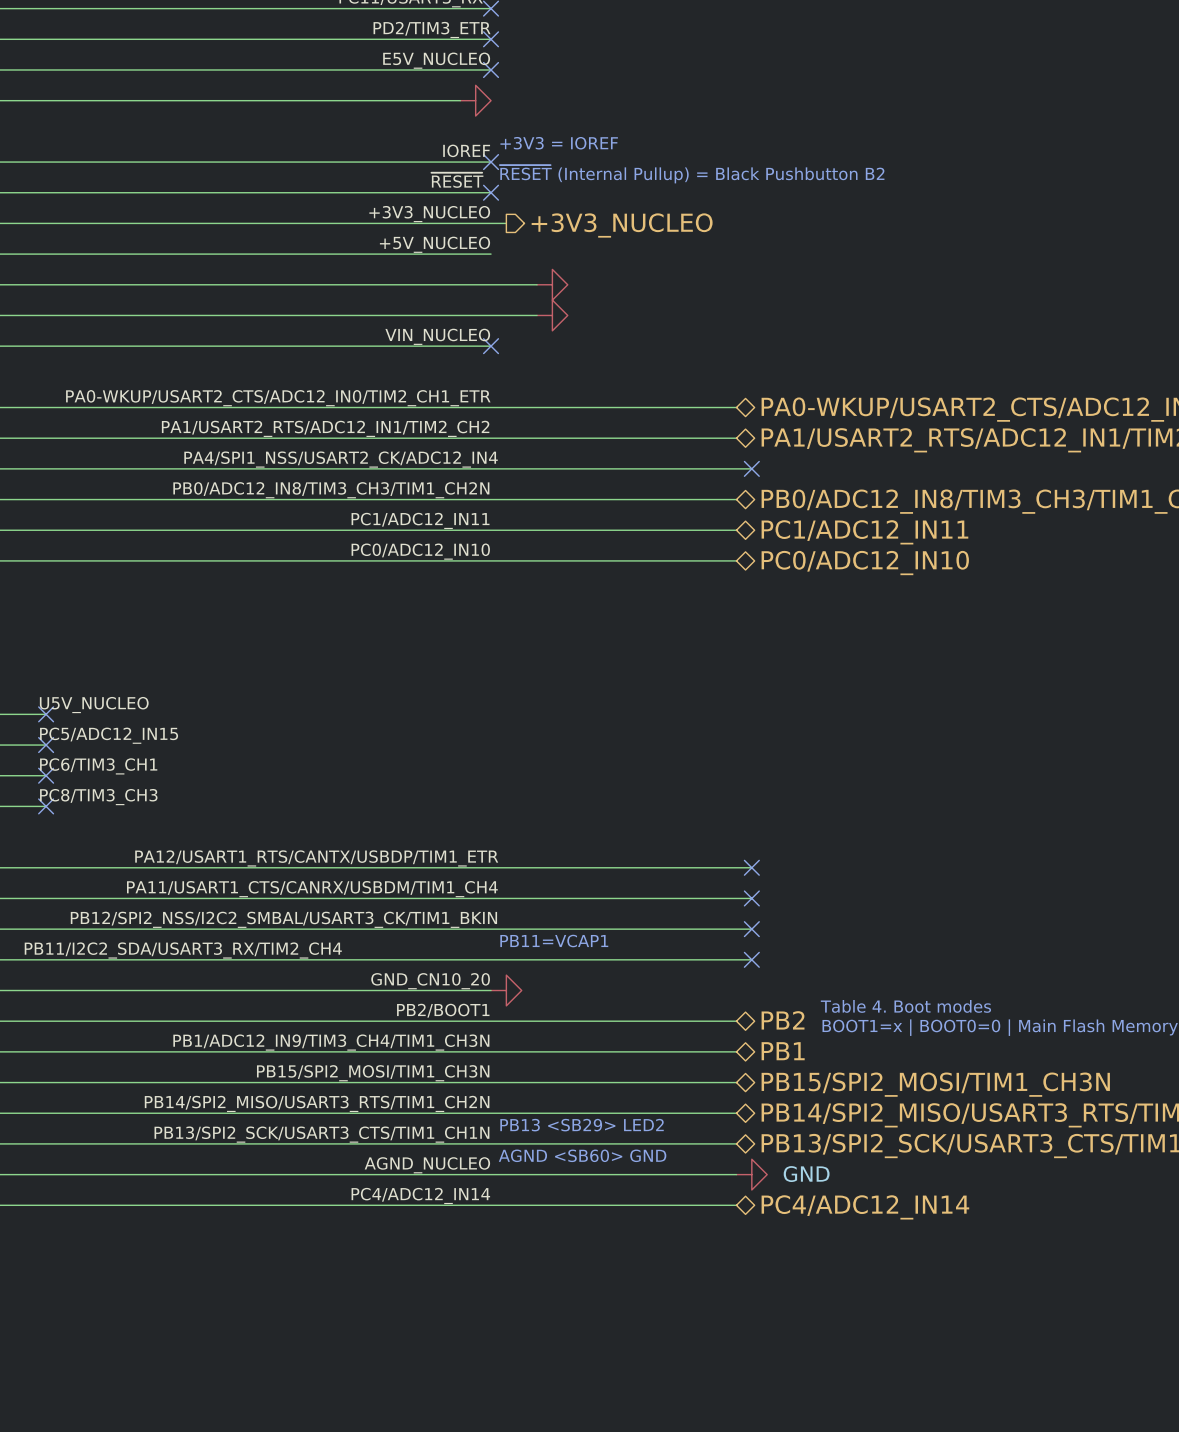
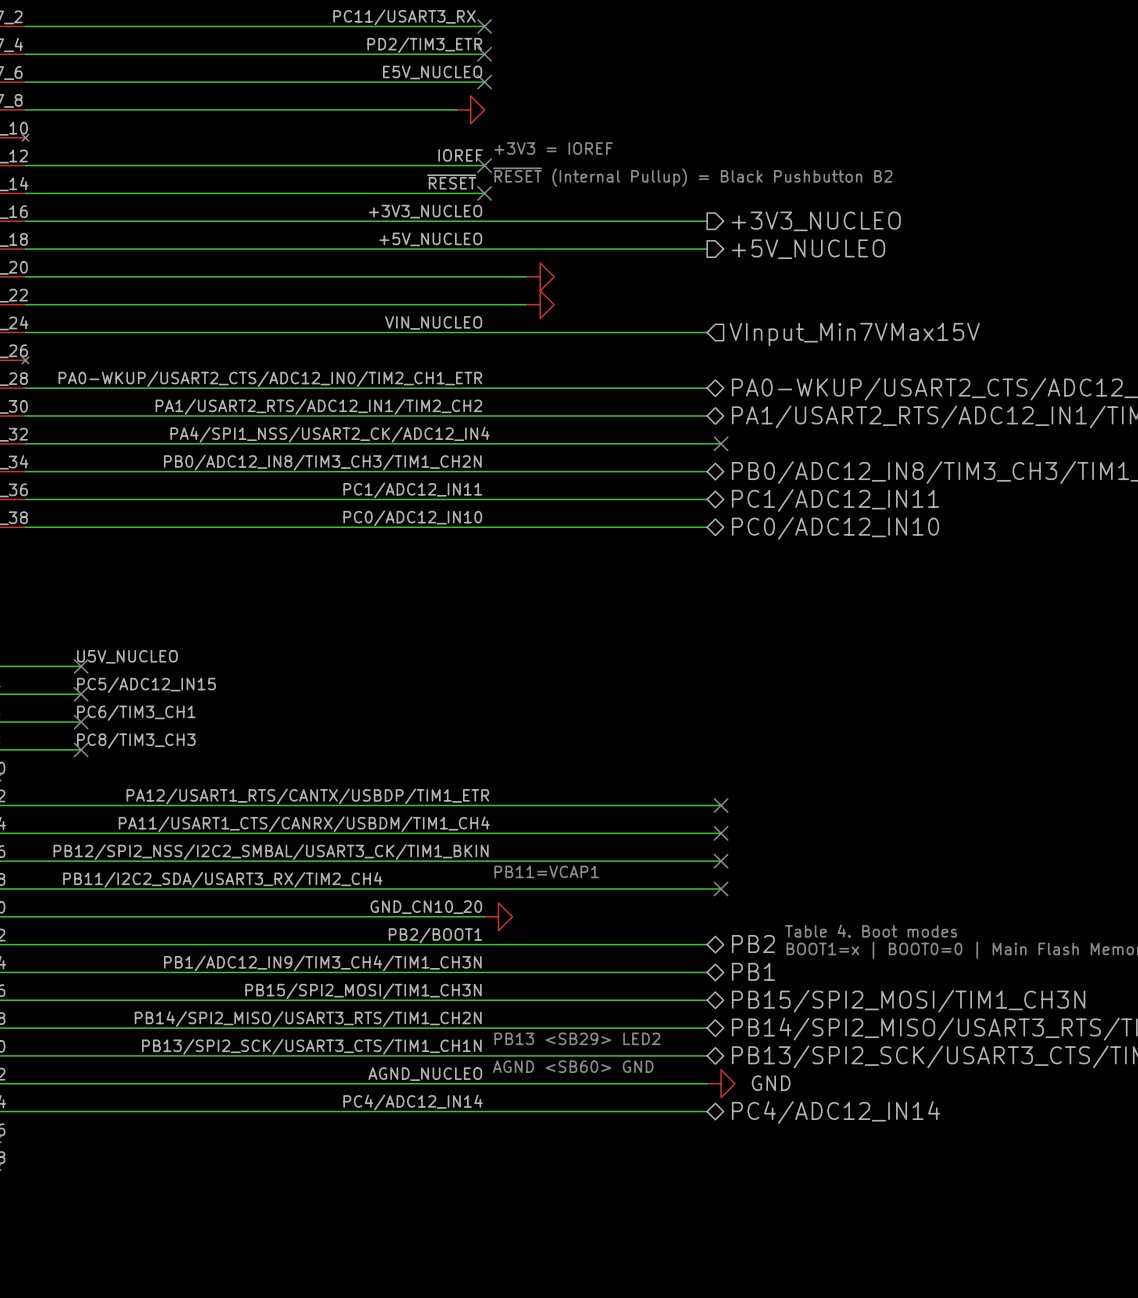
wire: none -> (498, 221) (707, 221)
hierarchical label position: +3V3_NUCLEO (622, 225) -> +3V3_NUCLEO (816, 221)
wire: none -> (484, 249) (707, 249)
hierarchical label: none -> +5V_NUCLEO (808, 249)
wire: none -> (484, 332) (707, 332)
no-connect mark: (491, 346) -> none
hierarchical label: none -> VInput_Min7VMax15V (854, 334)

